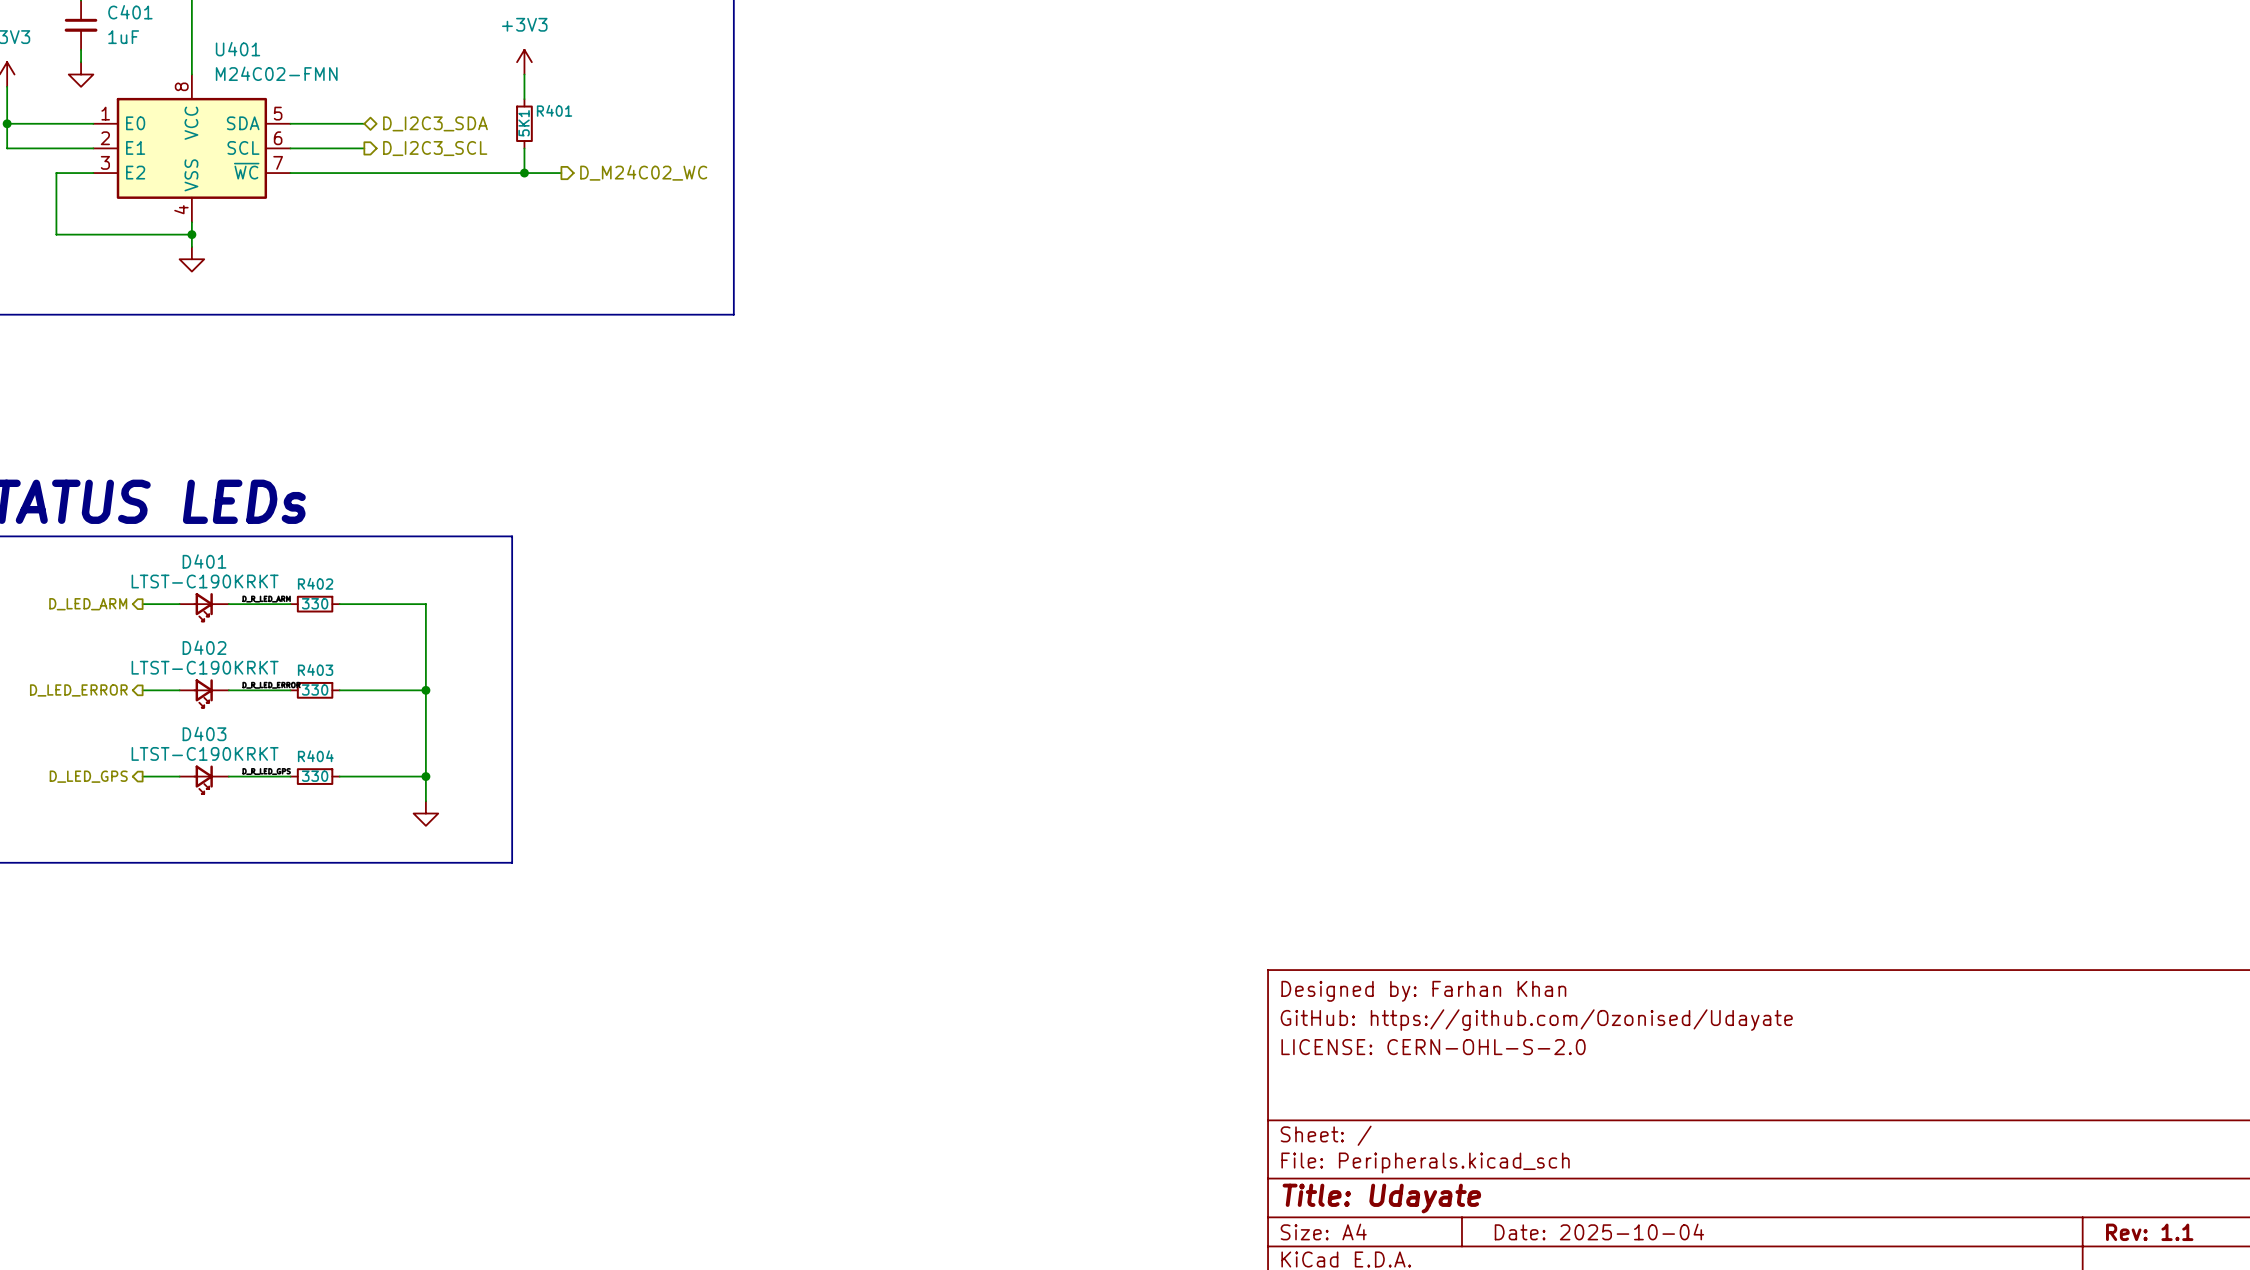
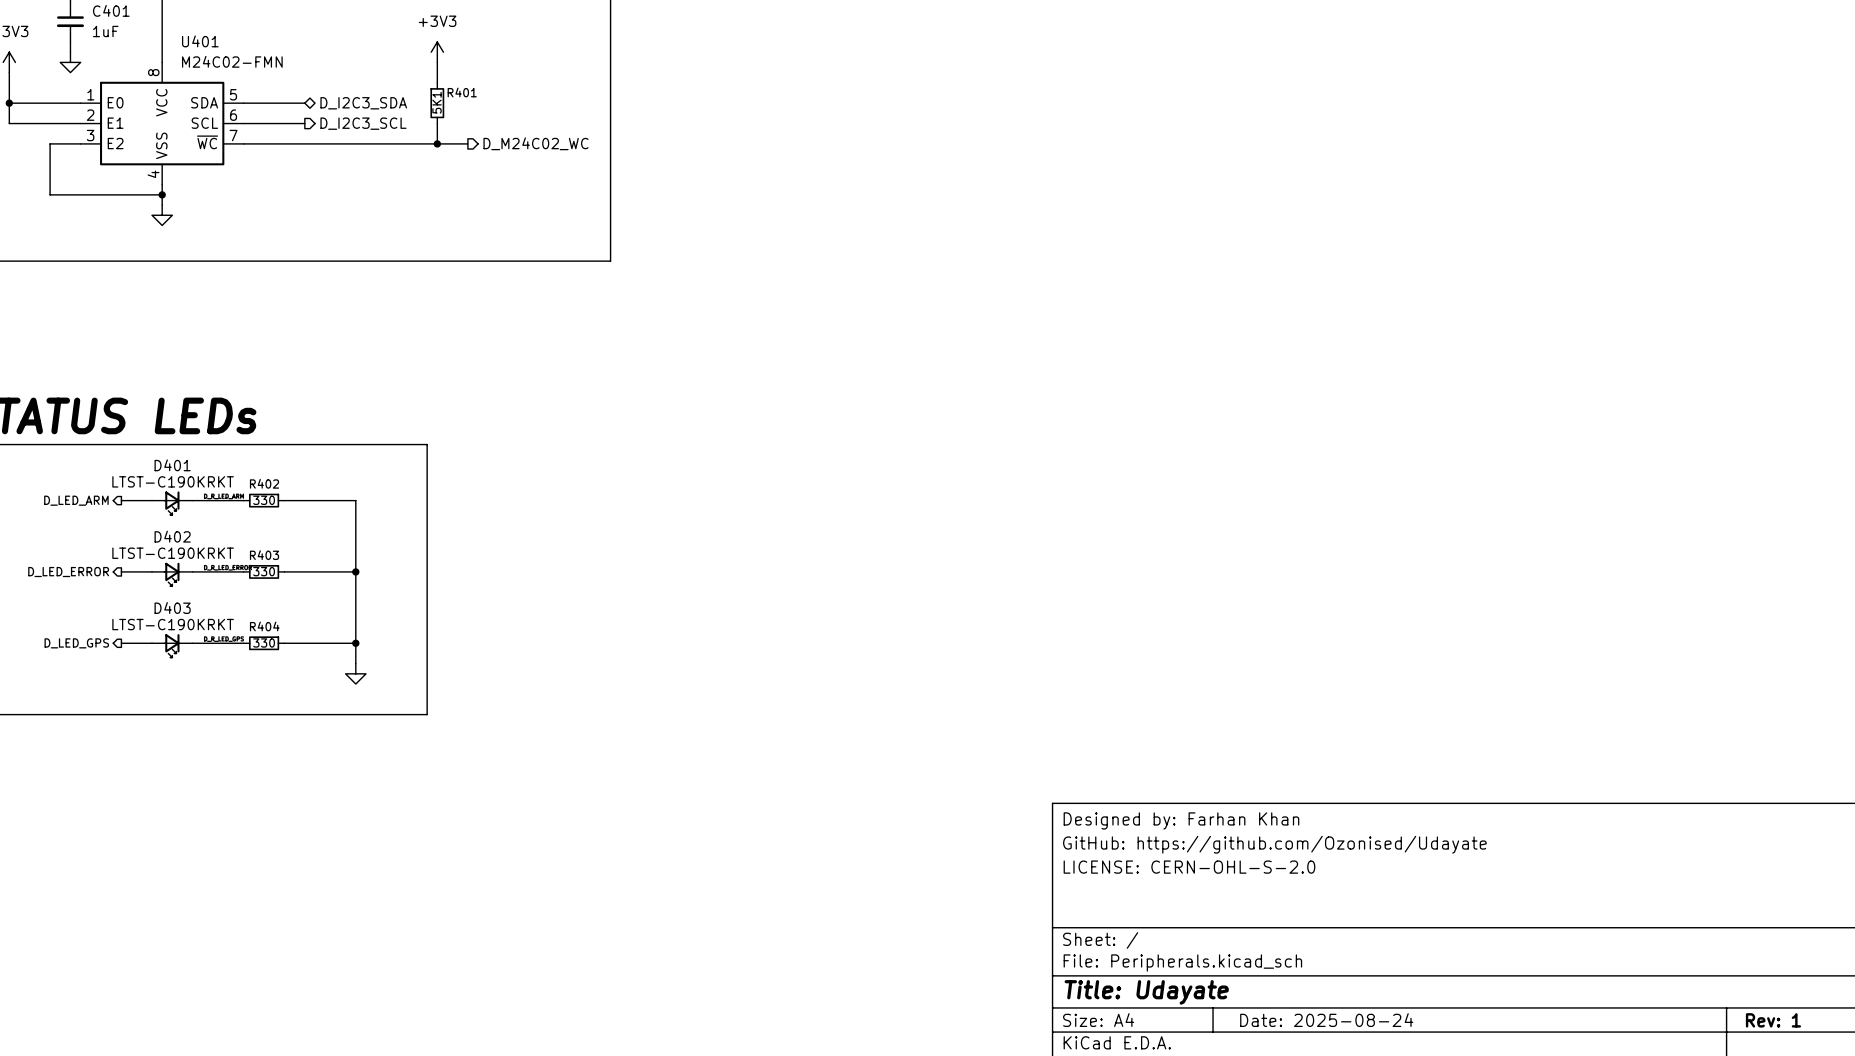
title block: Date: 2025-10-04 (1599, 1231) -> Date: 2025-08-24 (1326, 1020)
title block: Rev: 1.1 (2149, 1232) -> Rev: 1 (1773, 1020)

